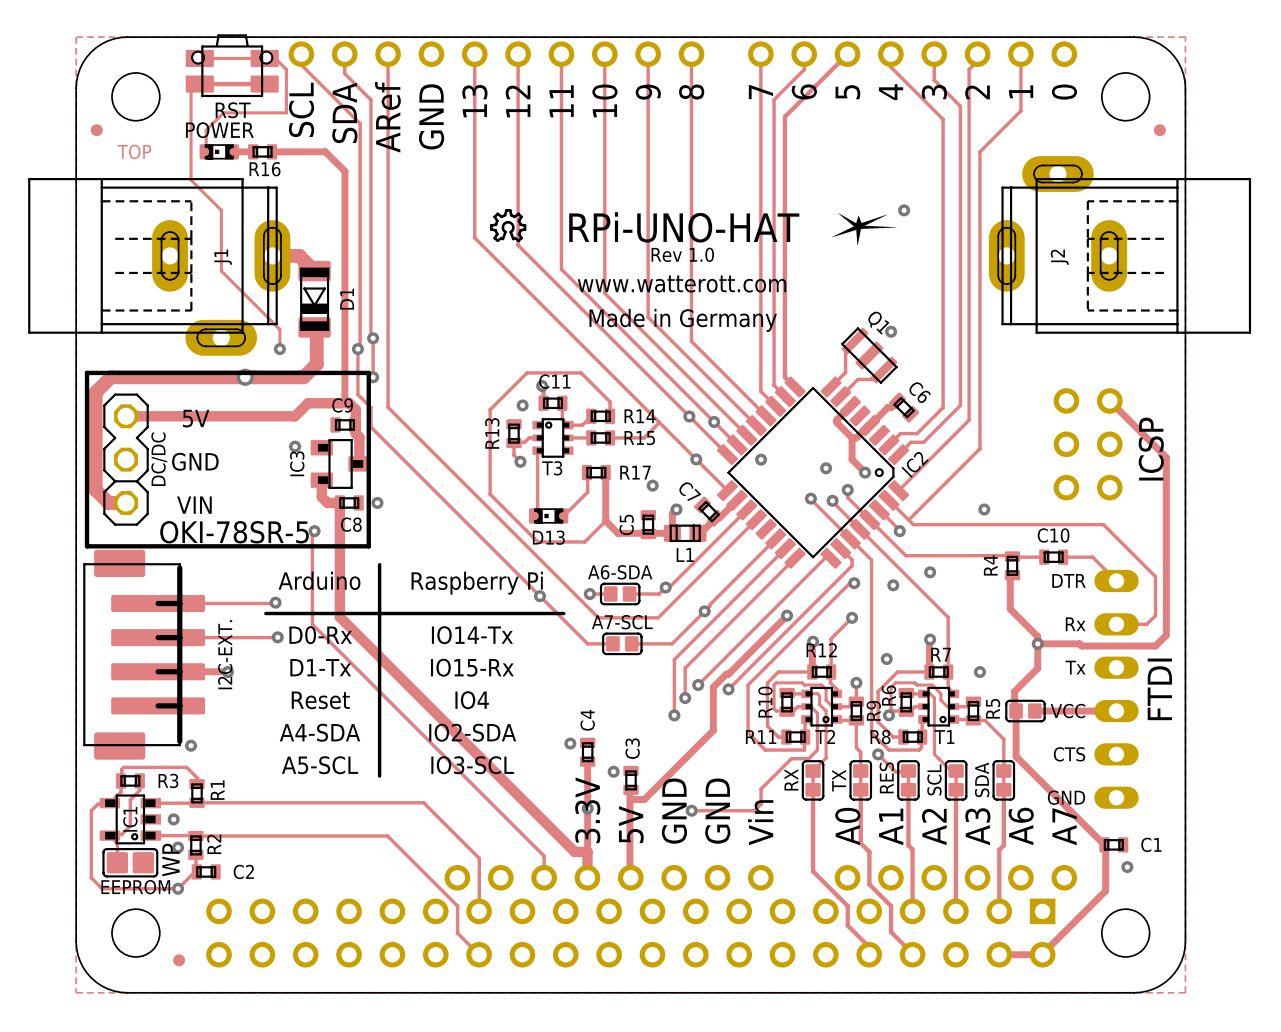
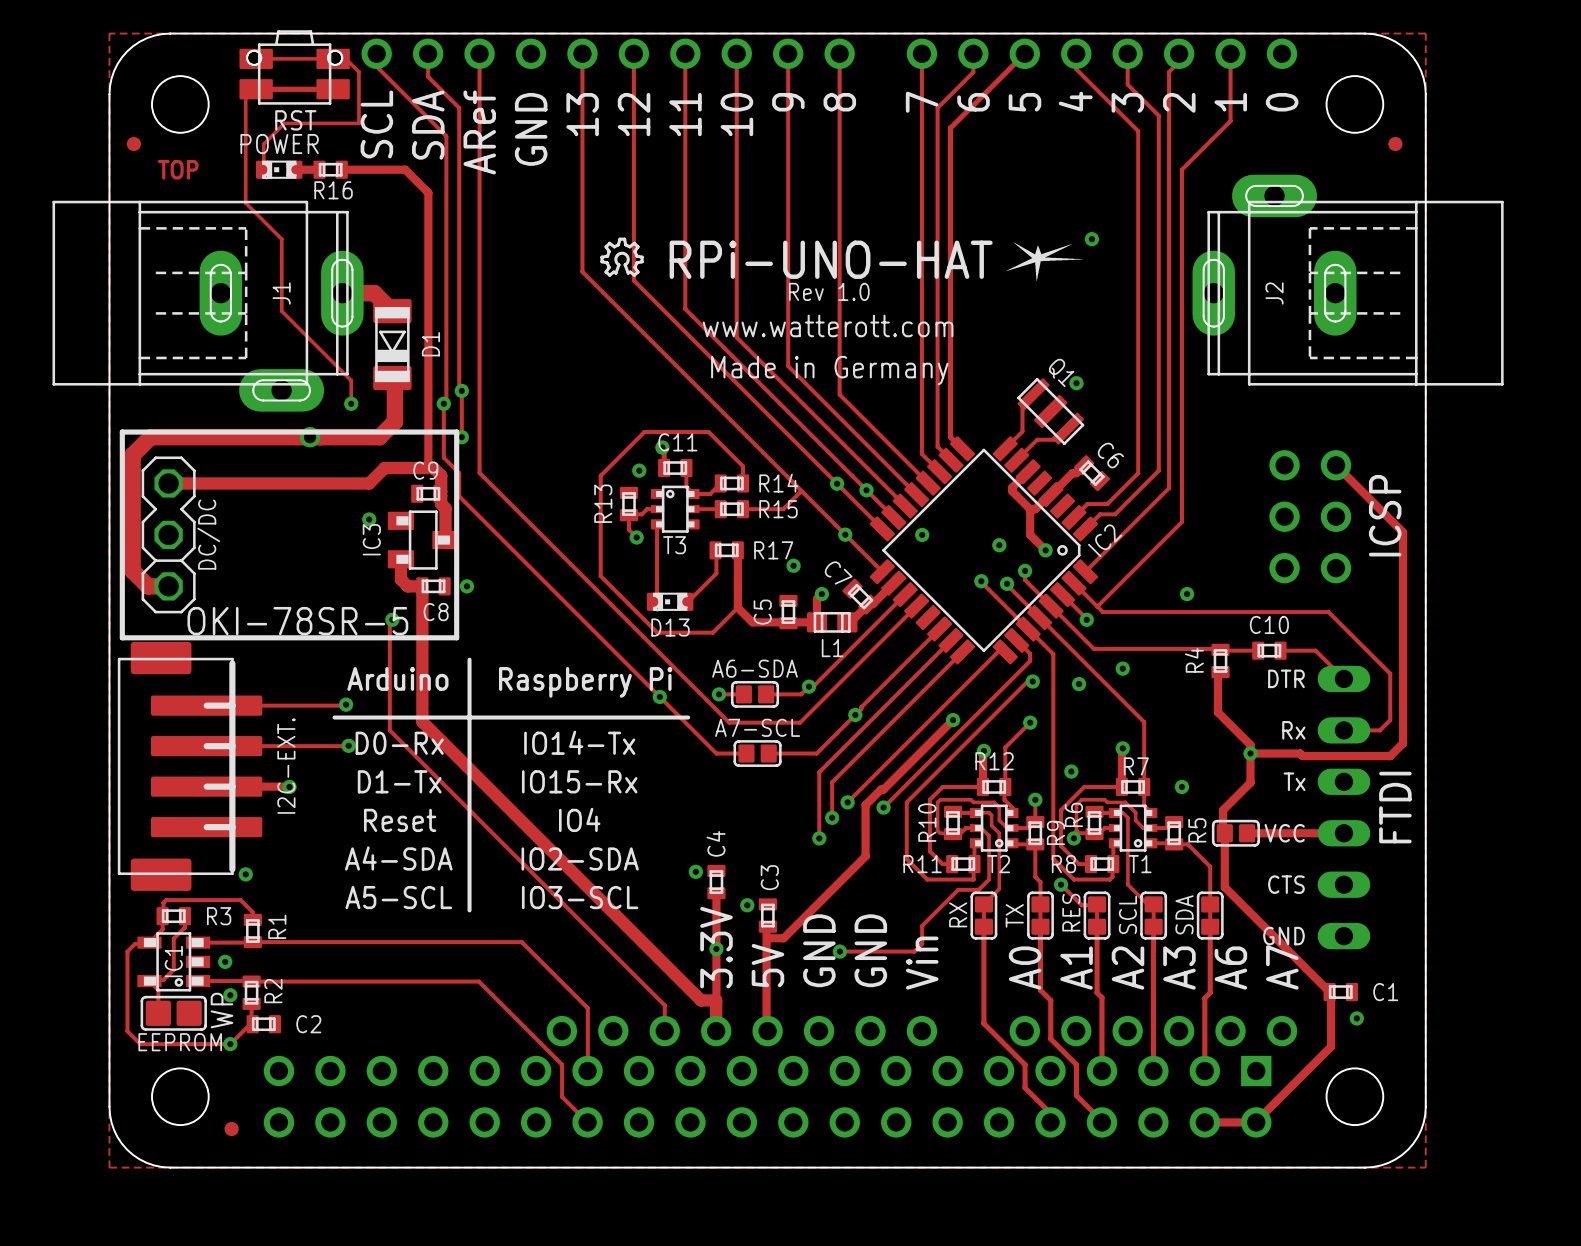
text: 5V (196, 418) -> none
text: GND (195, 461) -> none
text: VIN (194, 505) -> none

